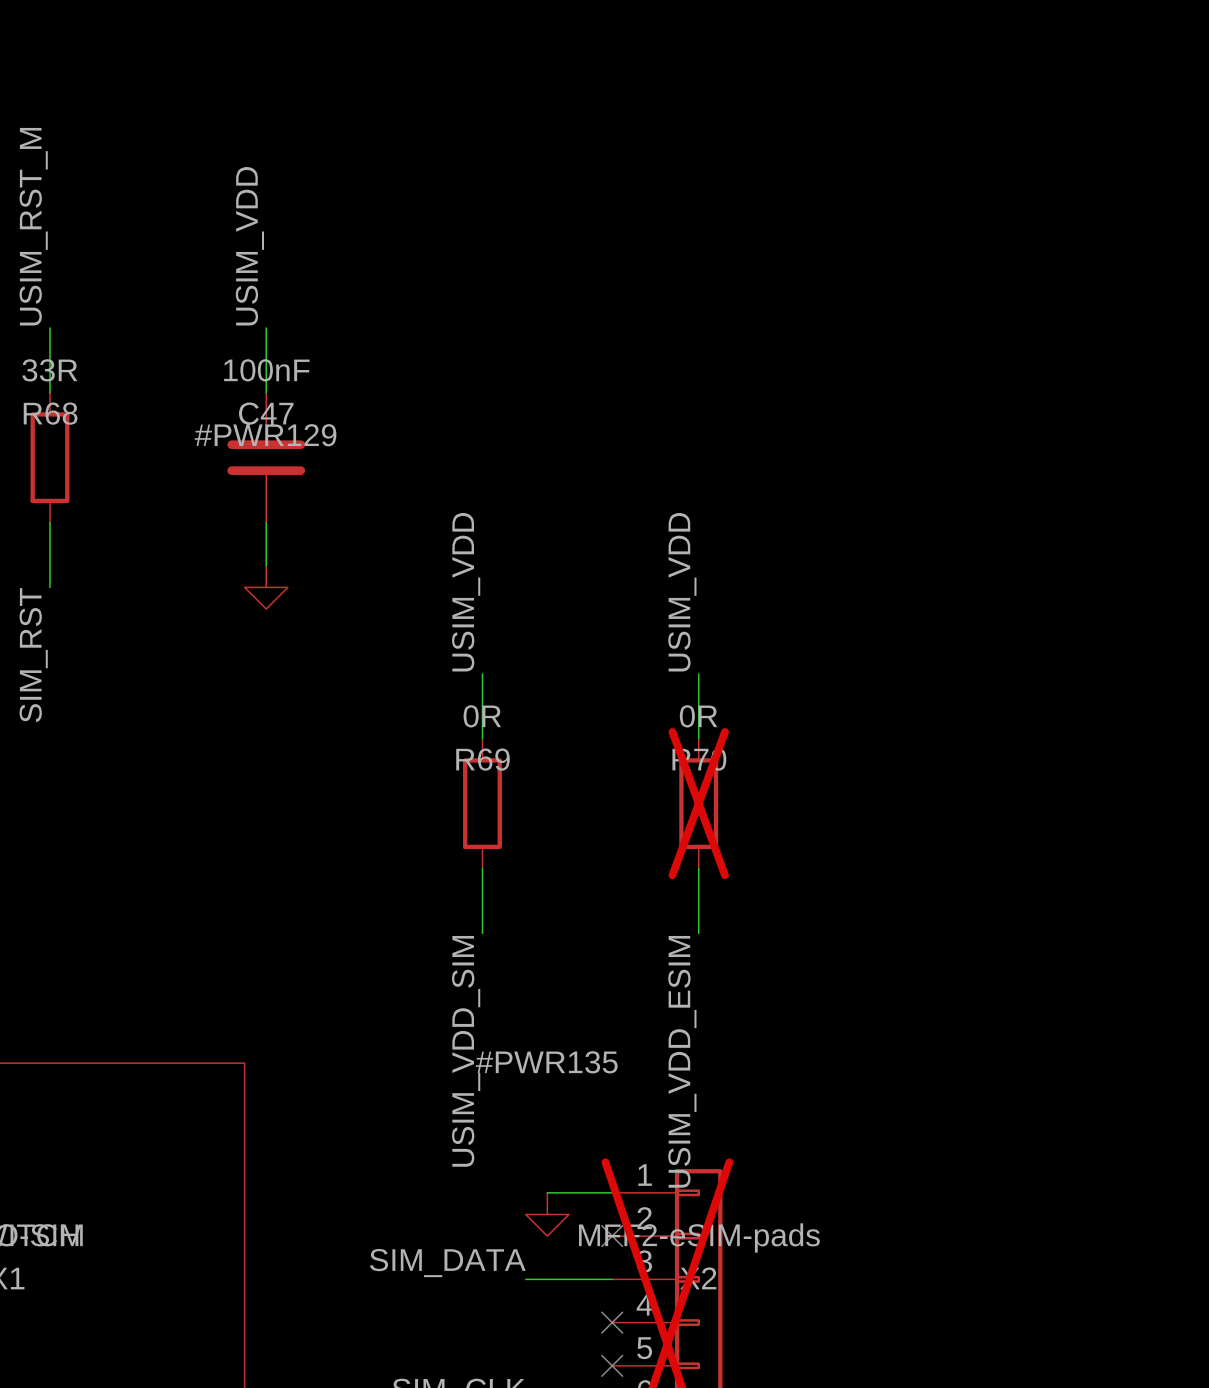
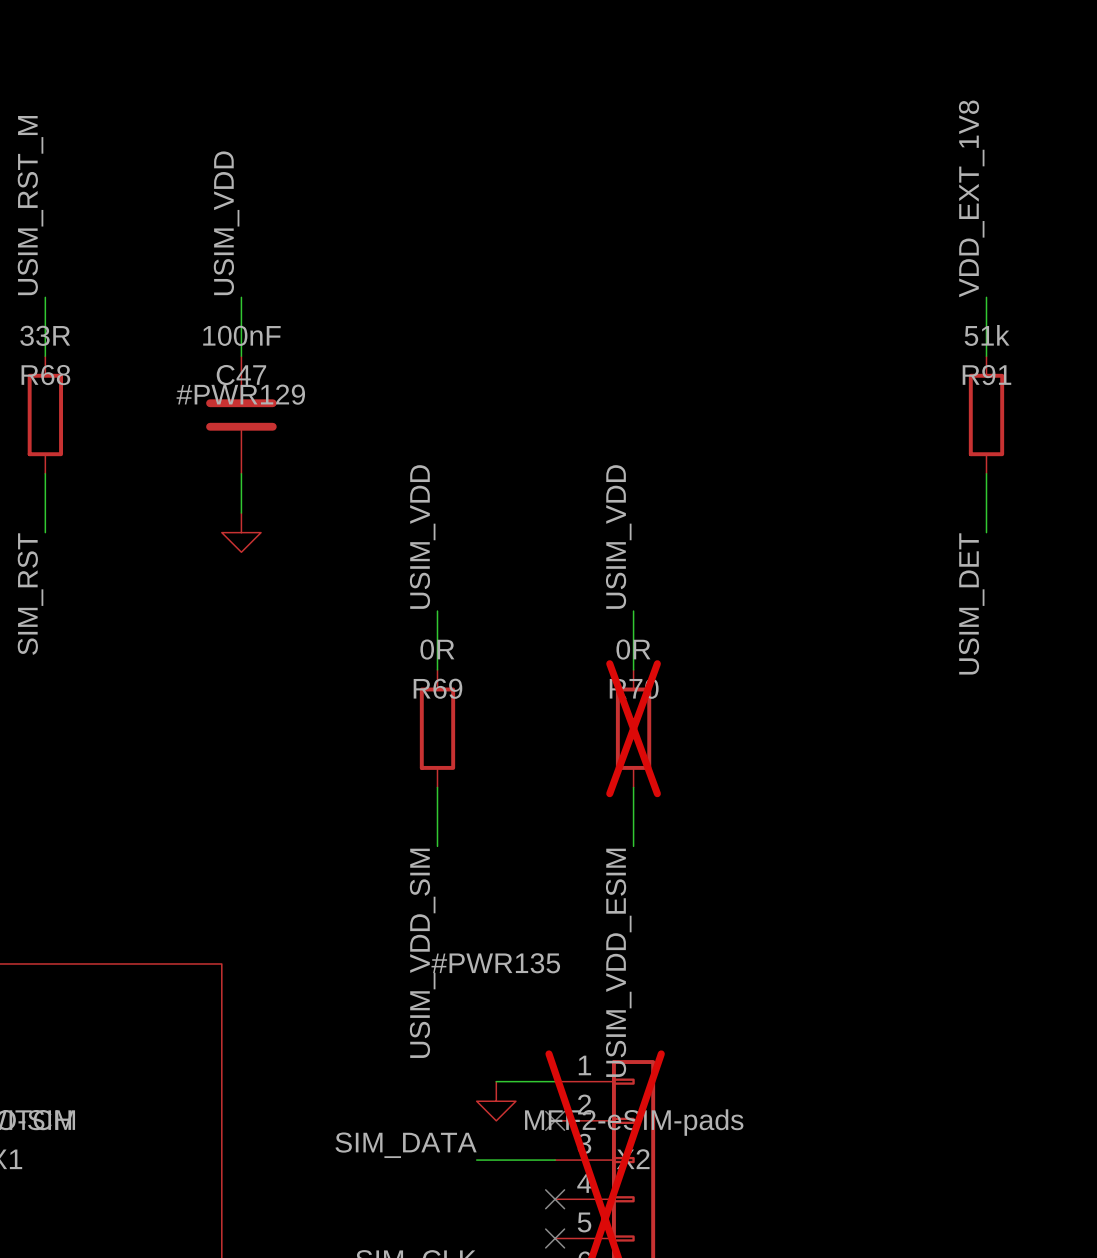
label: none -> VDD_EXT_1V8 (971, 198)
wire: none -> (986, 297) (986, 356)
R91: none -> 51k (986, 414)
wire: none -> (986, 473) (986, 532)
label: none -> USIM_DET (971, 603)

